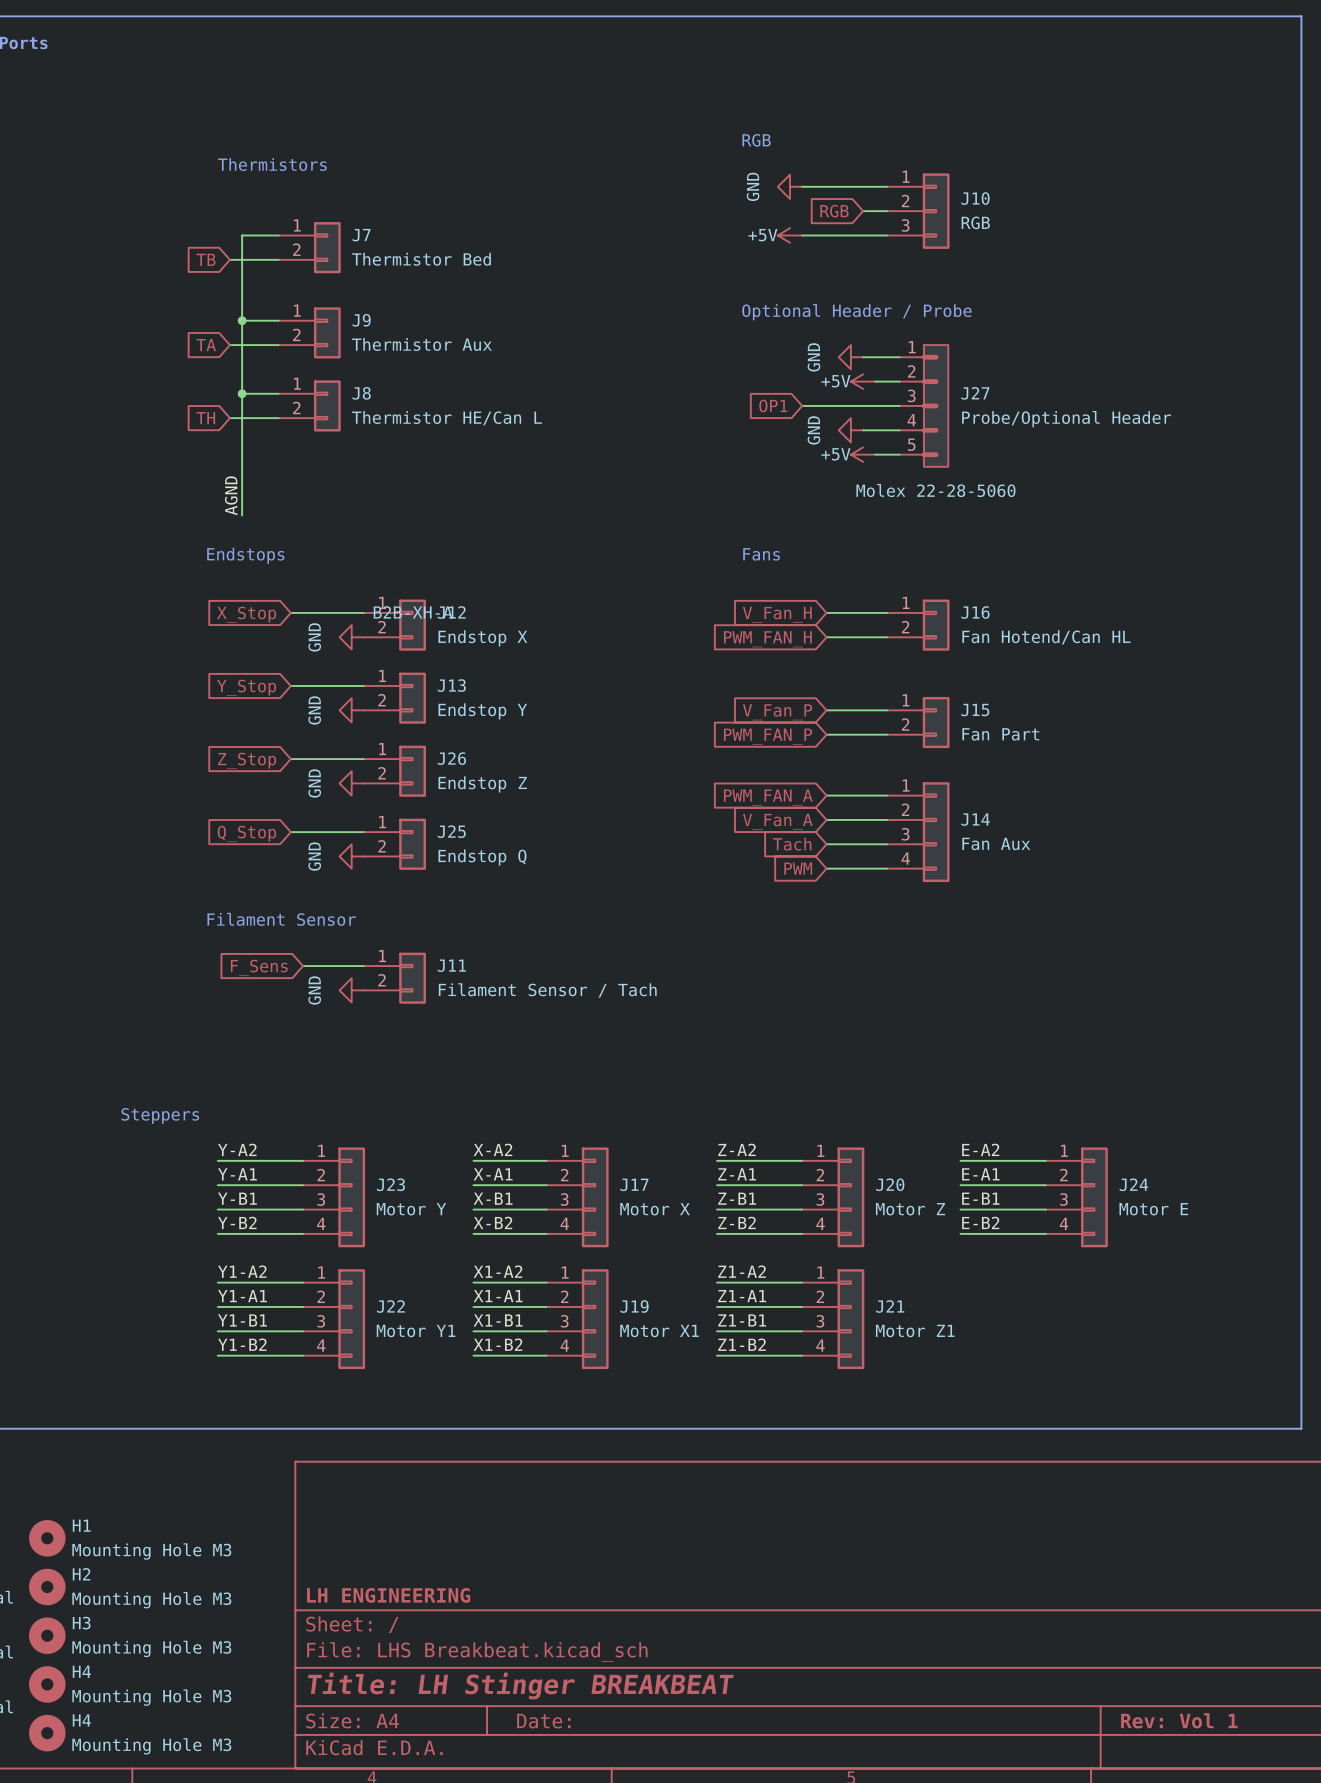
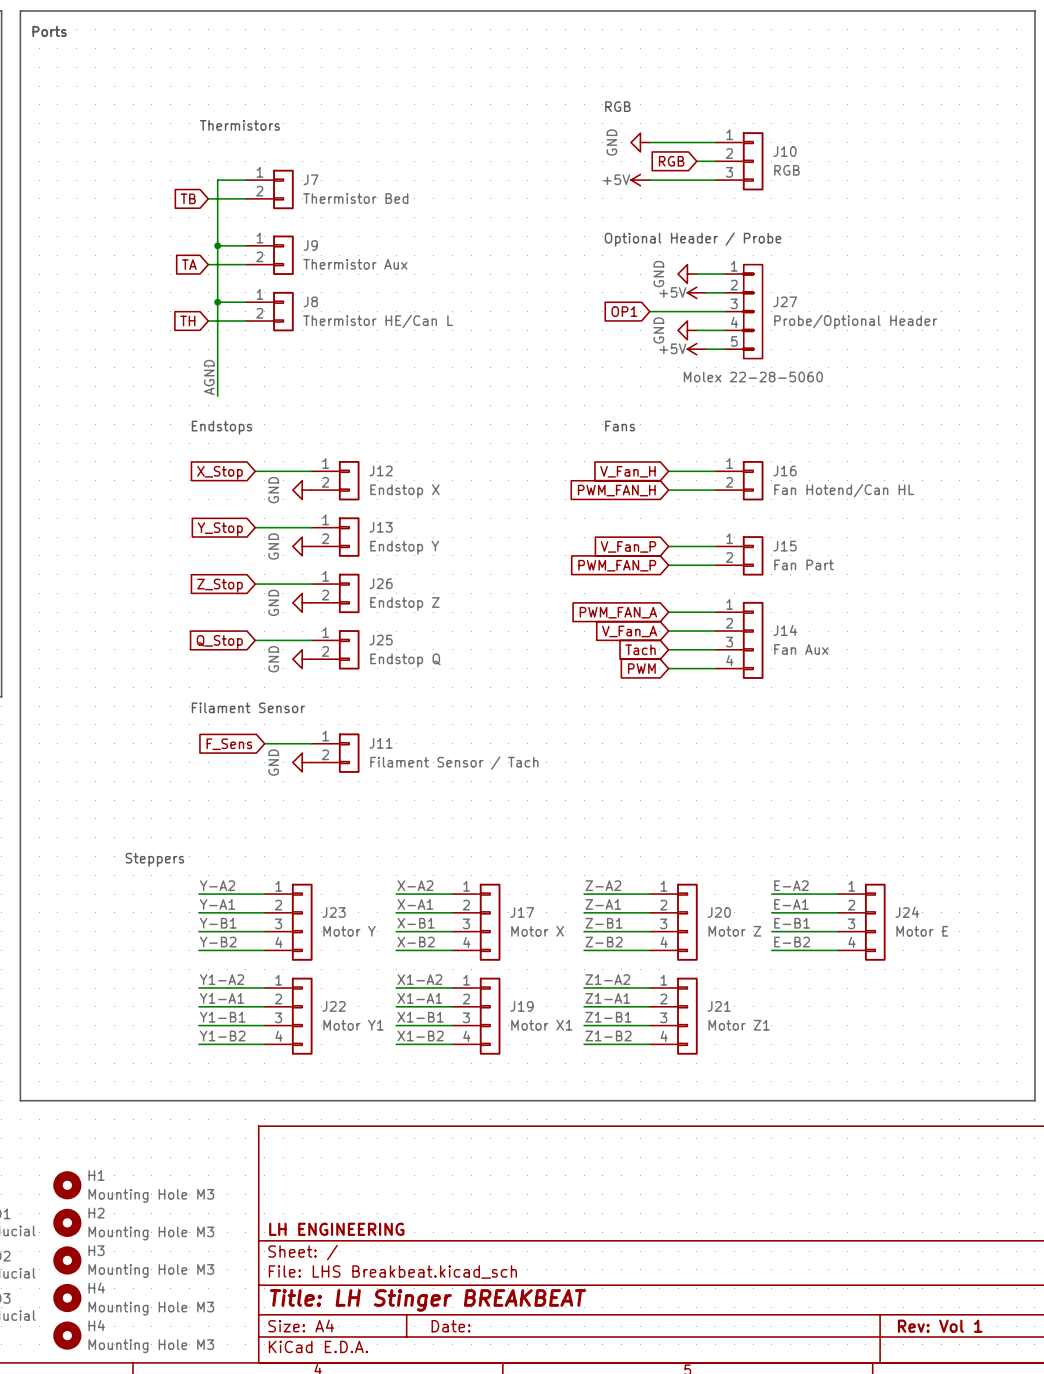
J12 text: B2B-XH-A (413, 612) -> none

